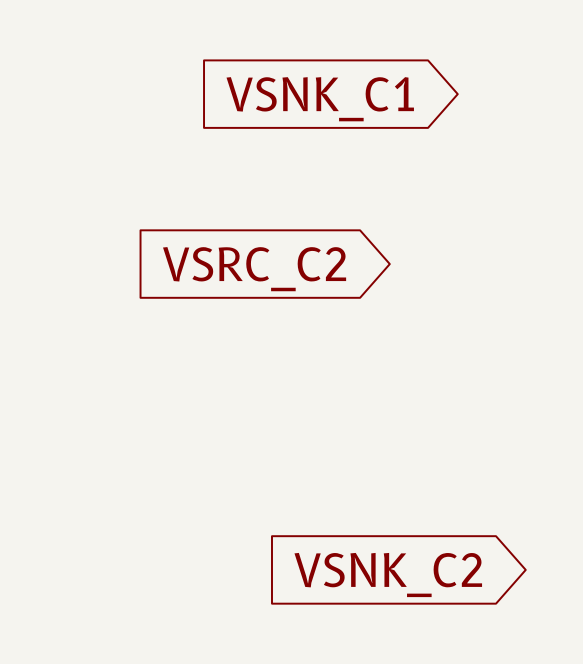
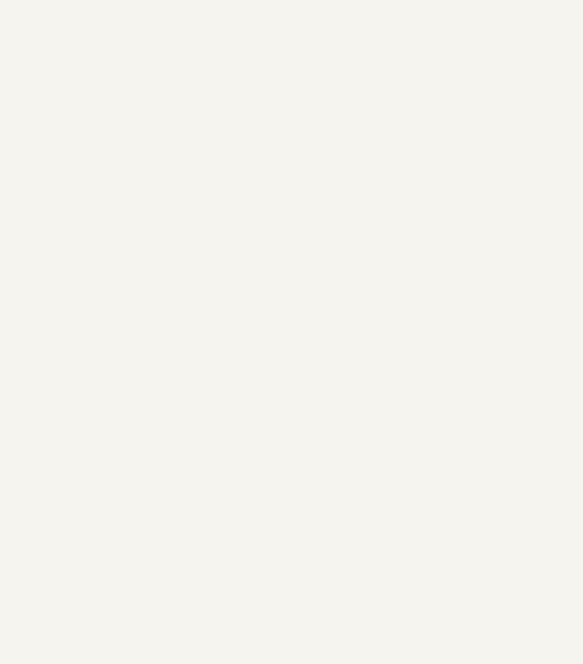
global label: VSNK_C1 (320, 99) -> none
global label: VSRC_C2 (254, 269) -> none
global label: VSNK_C2 (388, 575) -> none

